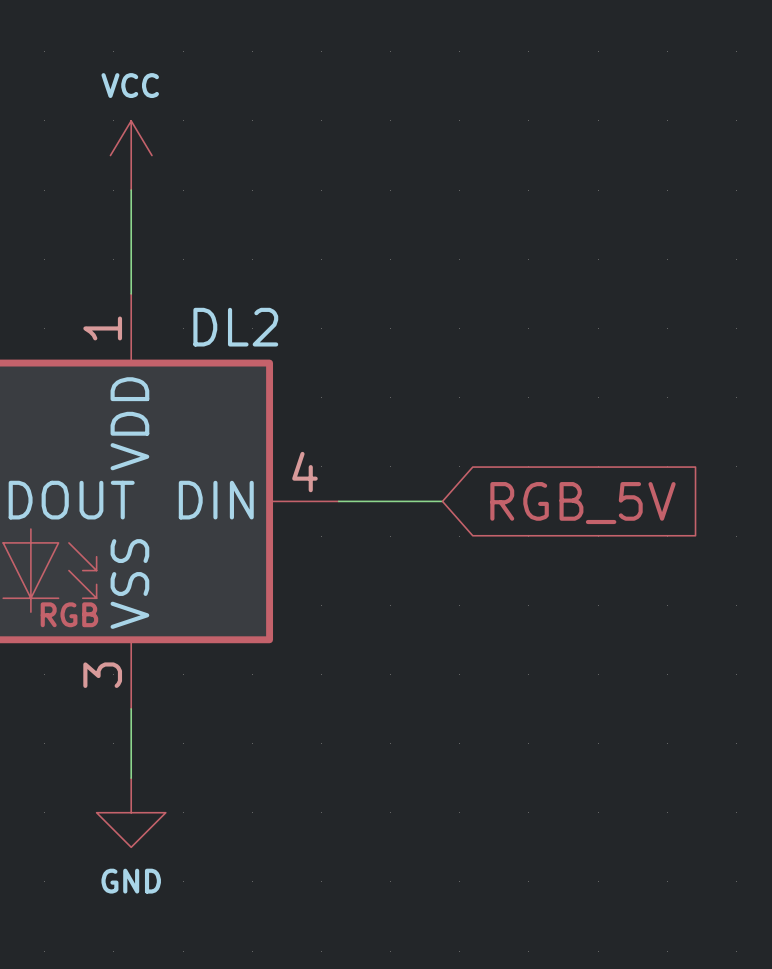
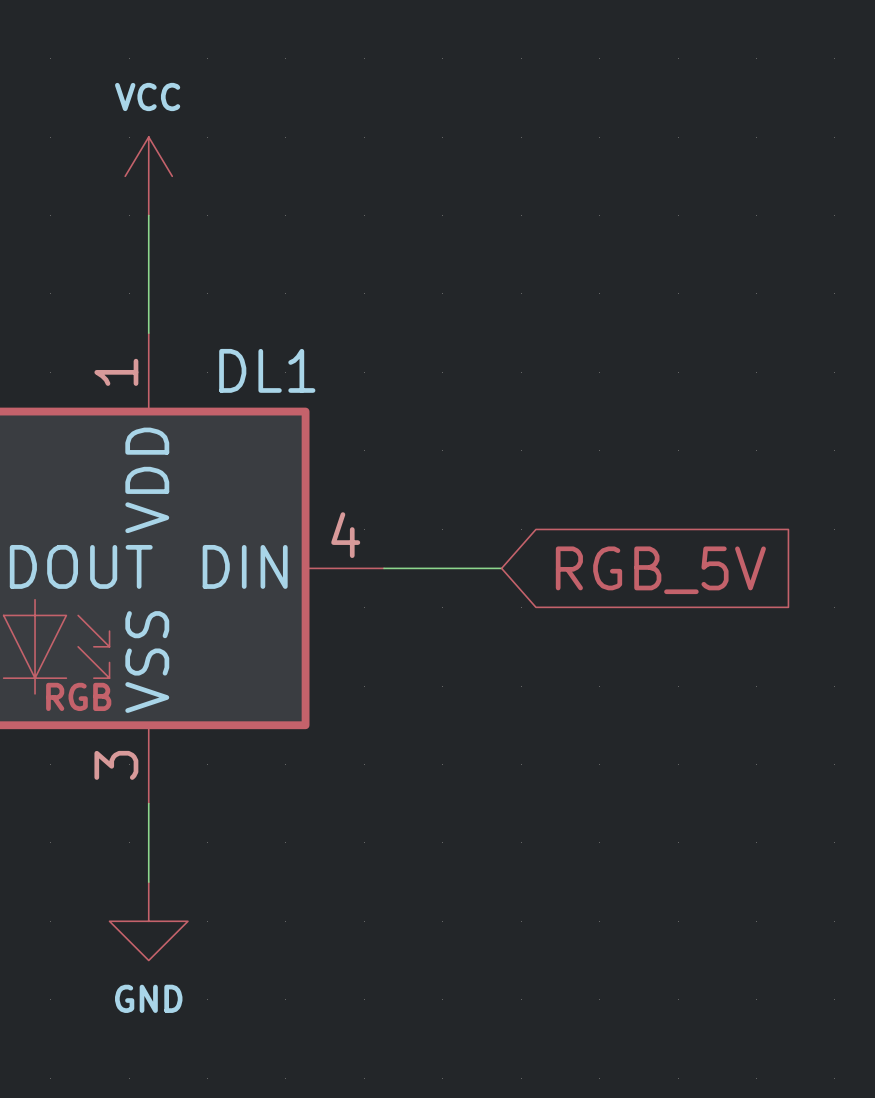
DL2 name: DL2 (235, 327) -> DL1 (267, 370)

